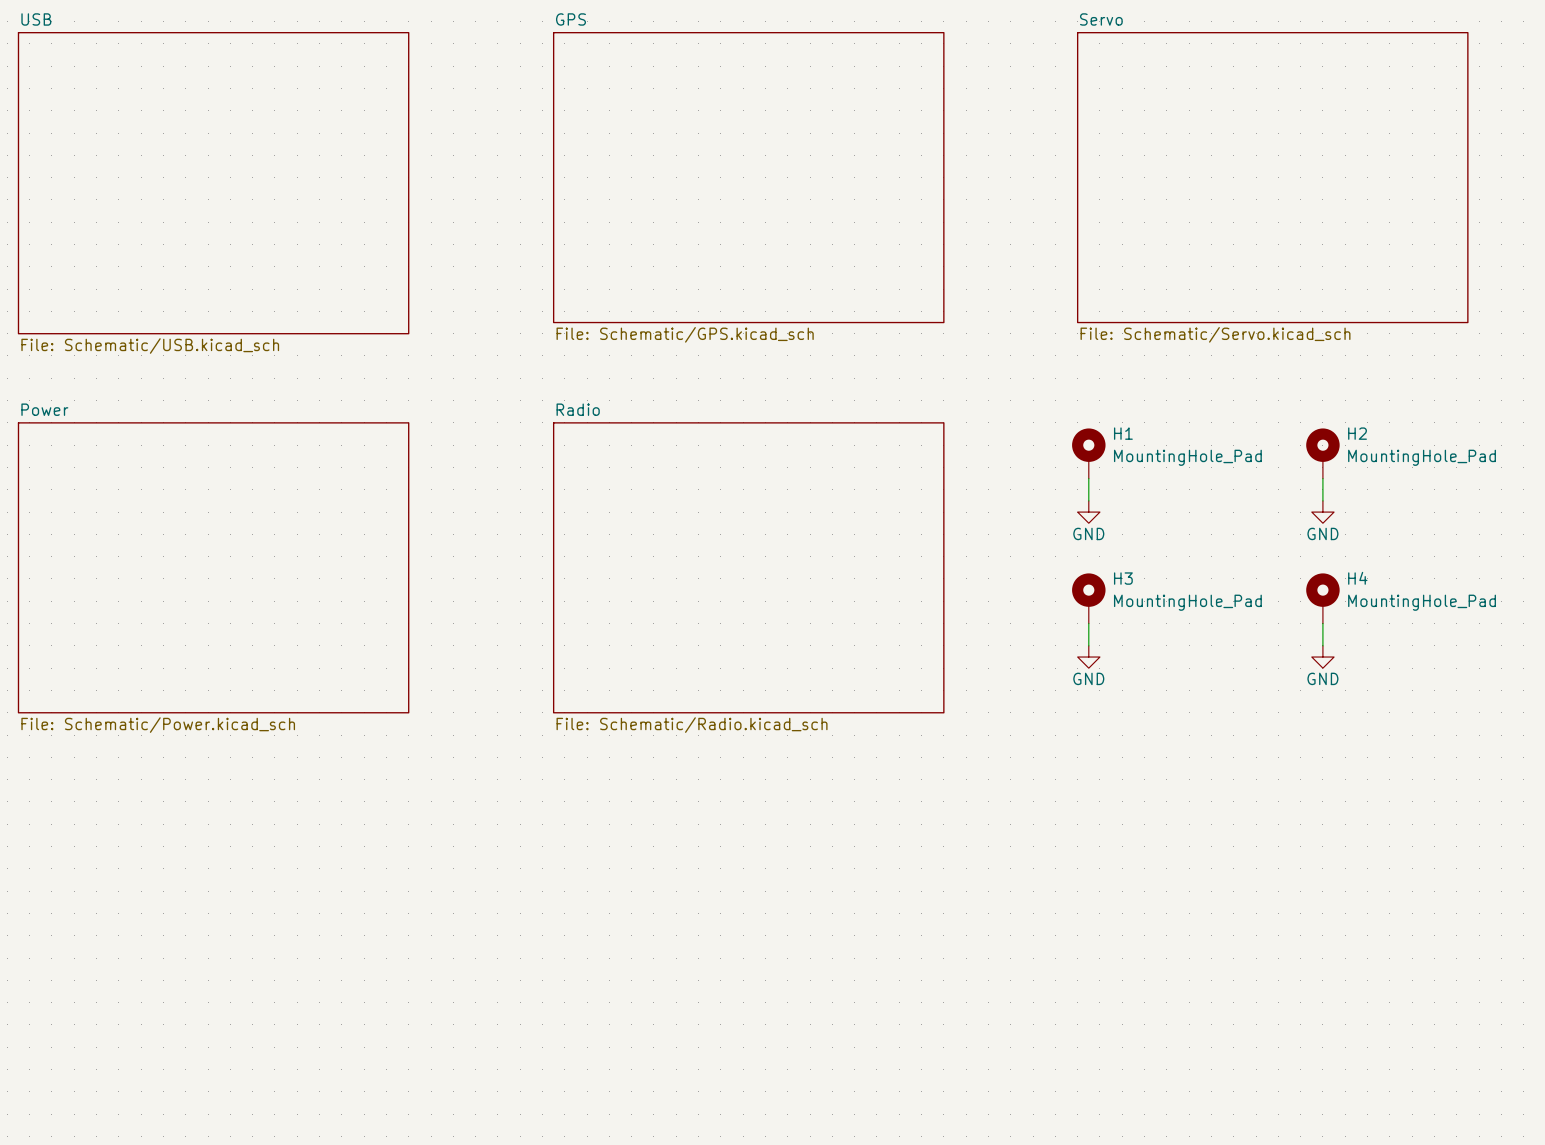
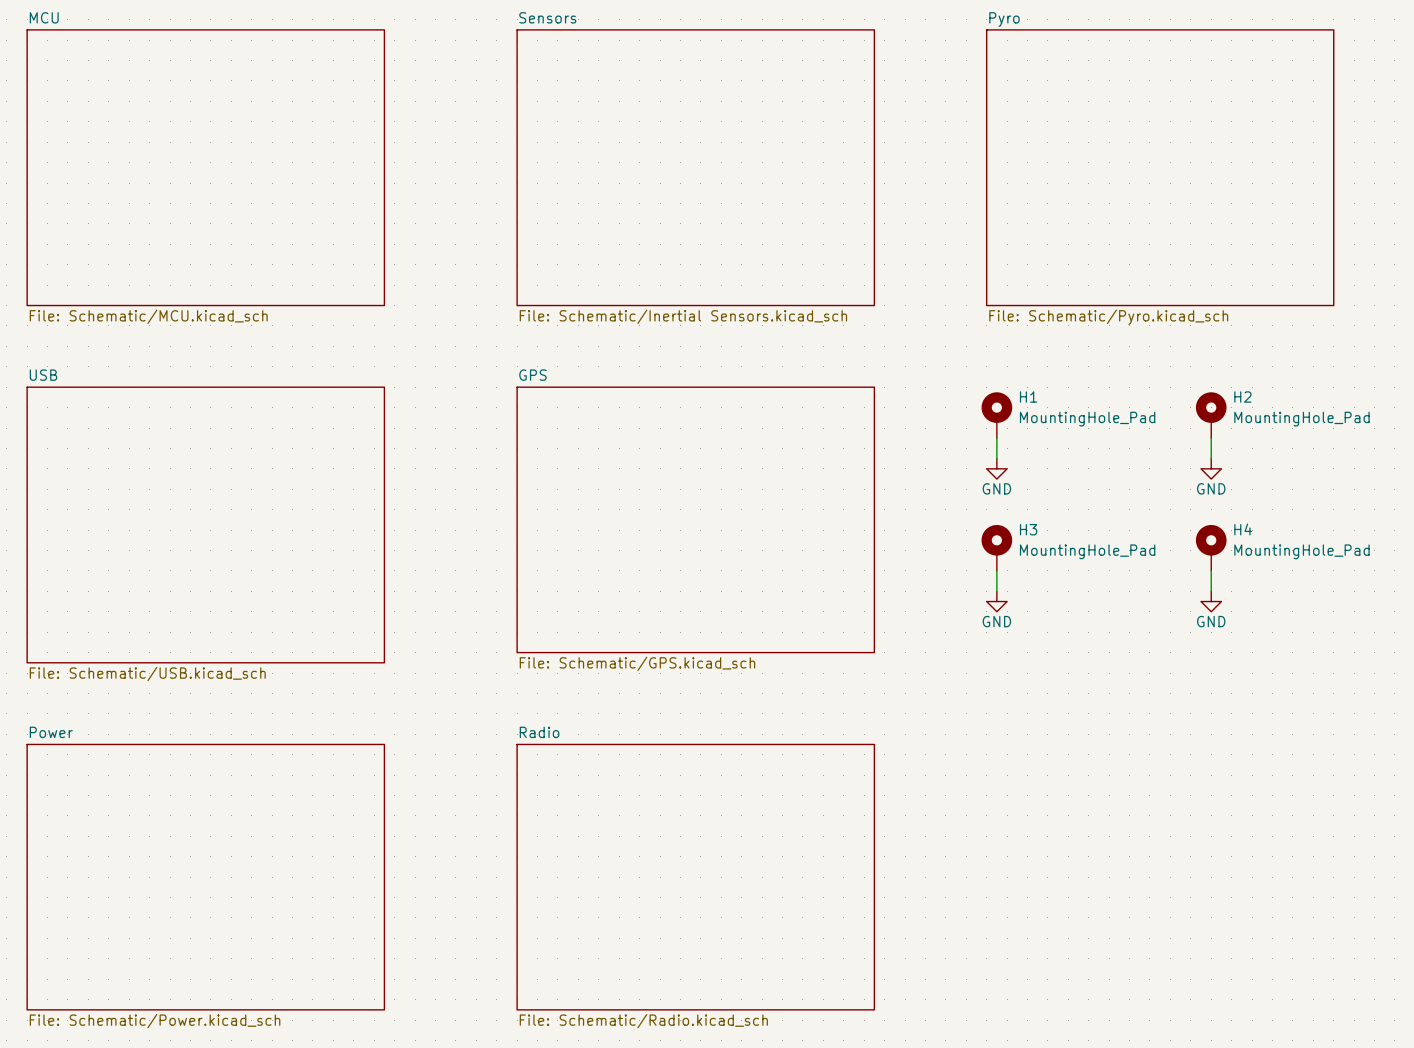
sheet GPS: File: Schematic/GPS.kicad_sch (748, 177) -> none
sheet Servo: File: Schematic/Servo.kicad_sch (1272, 177) -> none
sheet USB: File: Schematic/USB.kicad_sch (213, 183) -> none
sheet MCU: none -> File: Schematic/MCU.kicad_sch (205, 167)
sheet Sensors: none -> File: Schematic/Inertial Sensors.kicad_sch (695, 167)
sheet Pyro: none -> File: Schematic/Pyro.kicad_sch (1160, 167)
sheet Power: File: Schematic/Power.kicad_sch (213, 567) -> none
sheet Radio: File: Schematic/Radio.kicad_sch (748, 567) -> none
sheet GPS: none -> File: Schematic/GPS.kicad_sch (695, 519)
sheet USB: none -> File: Schematic/USB.kicad_sch (205, 524)
sheet Power: none -> File: Schematic/Power.kicad_sch (205, 877)
sheet Radio: none -> File: Schematic/Radio.kicad_sch (695, 877)

